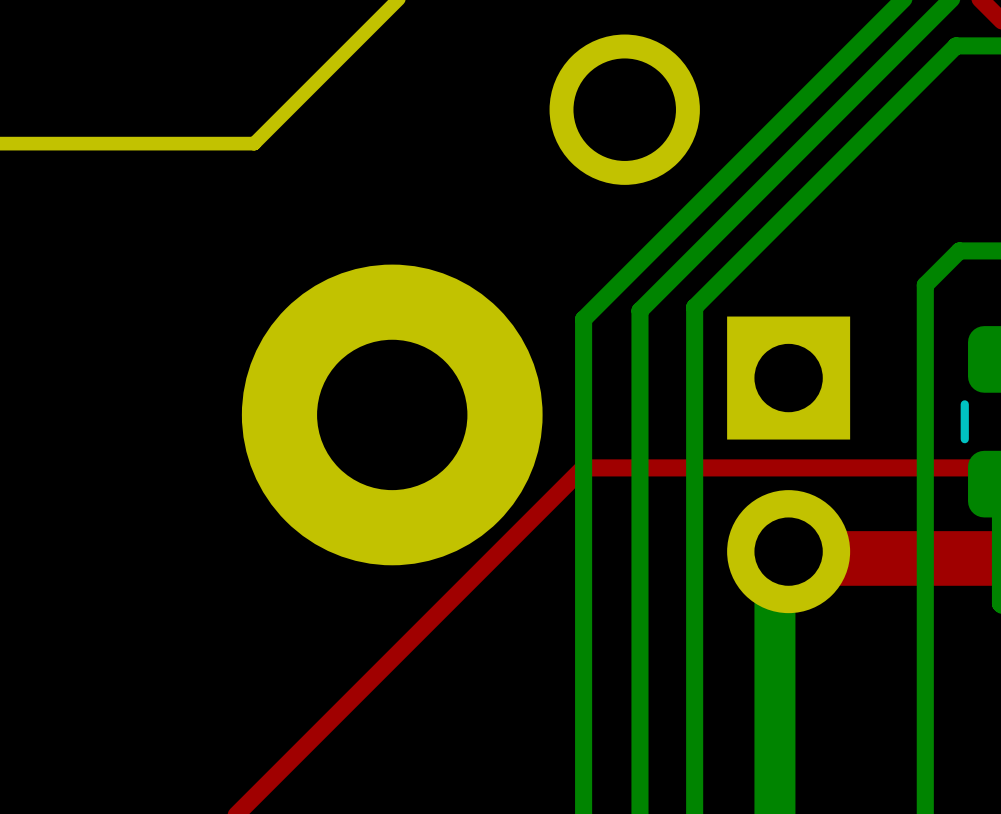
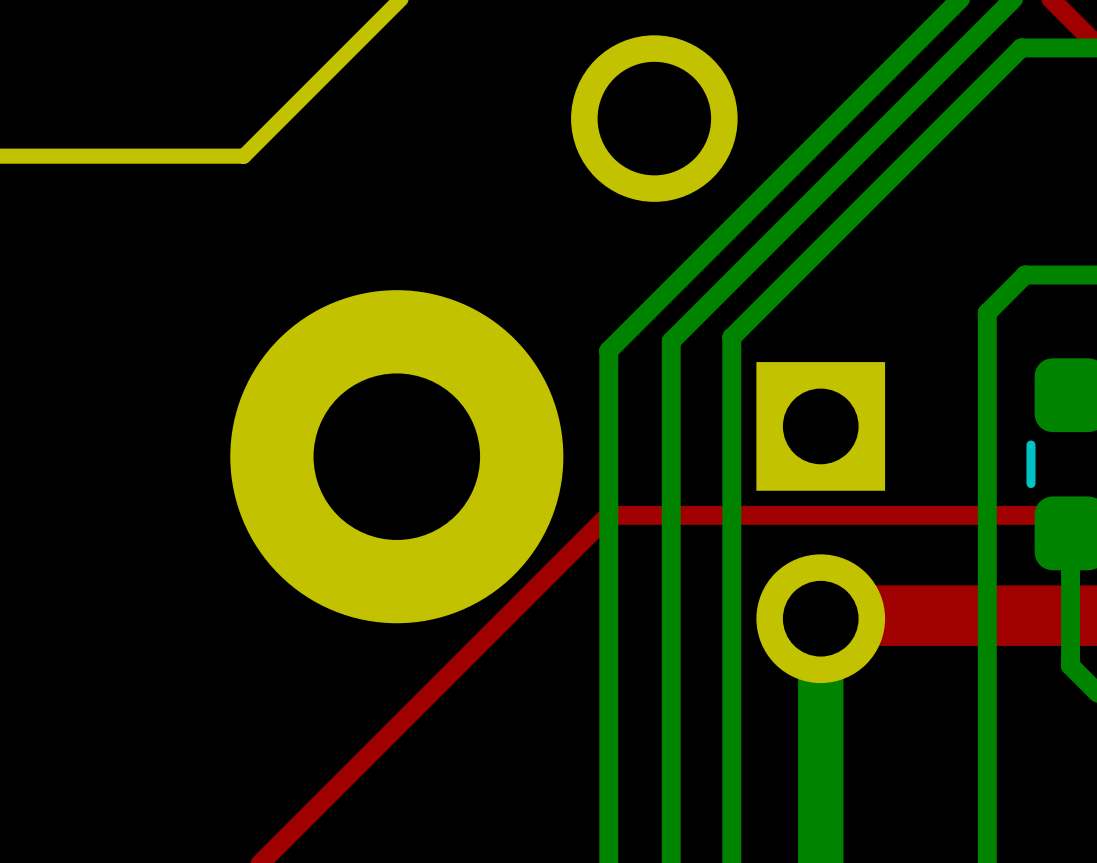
part footprint: [727, 316, 851, 614] -> [756, 362, 886, 684]

